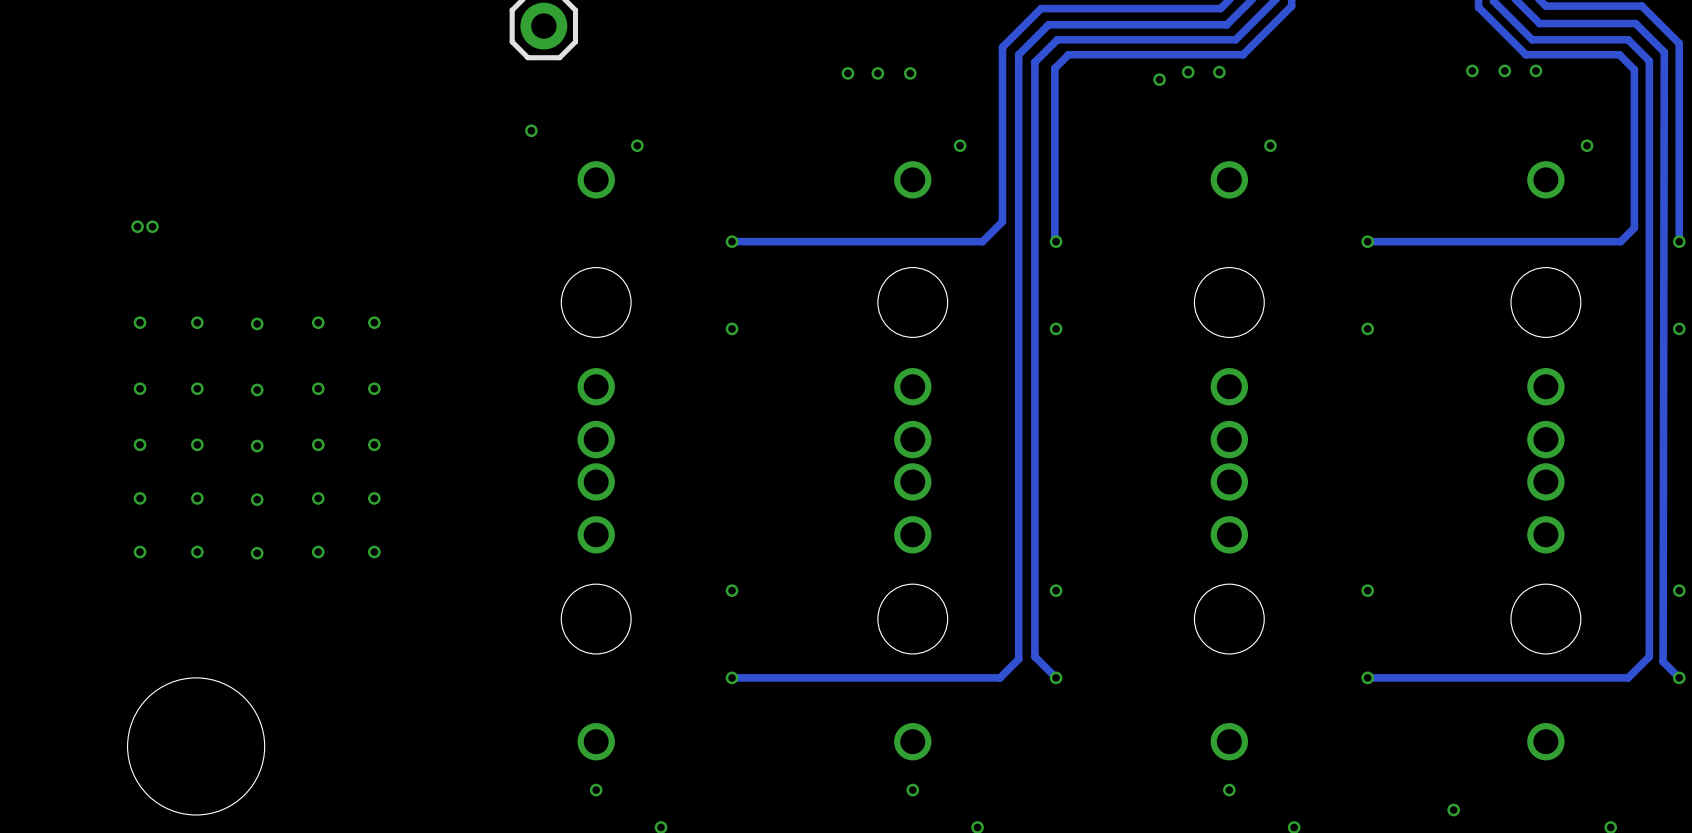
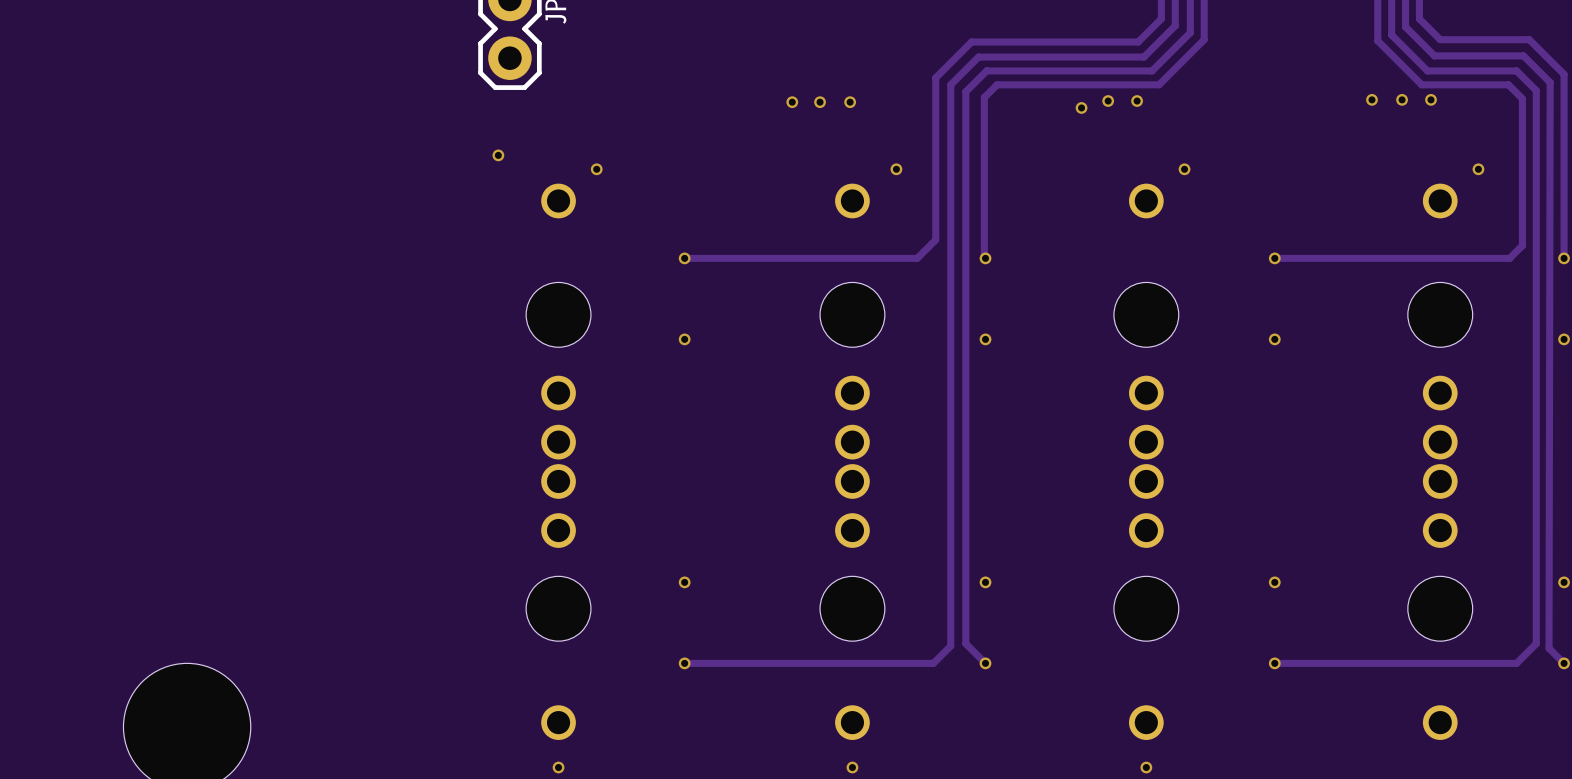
via: (137, 226) -> none
via: (152, 226) -> none
via: (140, 322) -> none
via: (197, 322) -> none
via: (318, 322) -> none
via: (374, 322) -> none
via: (257, 323) -> none
via: (140, 388) -> none
via: (197, 388) -> none
via: (318, 388) -> none
via: (374, 388) -> none
via: (257, 389) -> none
via: (140, 444) -> none
via: (197, 444) -> none
via: (318, 444) -> none
via: (374, 444) -> none
via: (257, 446) -> none
via: (140, 498) -> none
via: (197, 498) -> none
via: (318, 498) -> none
via: (374, 498) -> none
via: (257, 499) -> none
via: (140, 552) -> none
via: (197, 552) -> none
via: (318, 552) -> none
via: (374, 552) -> none
via: (257, 553) -> none

